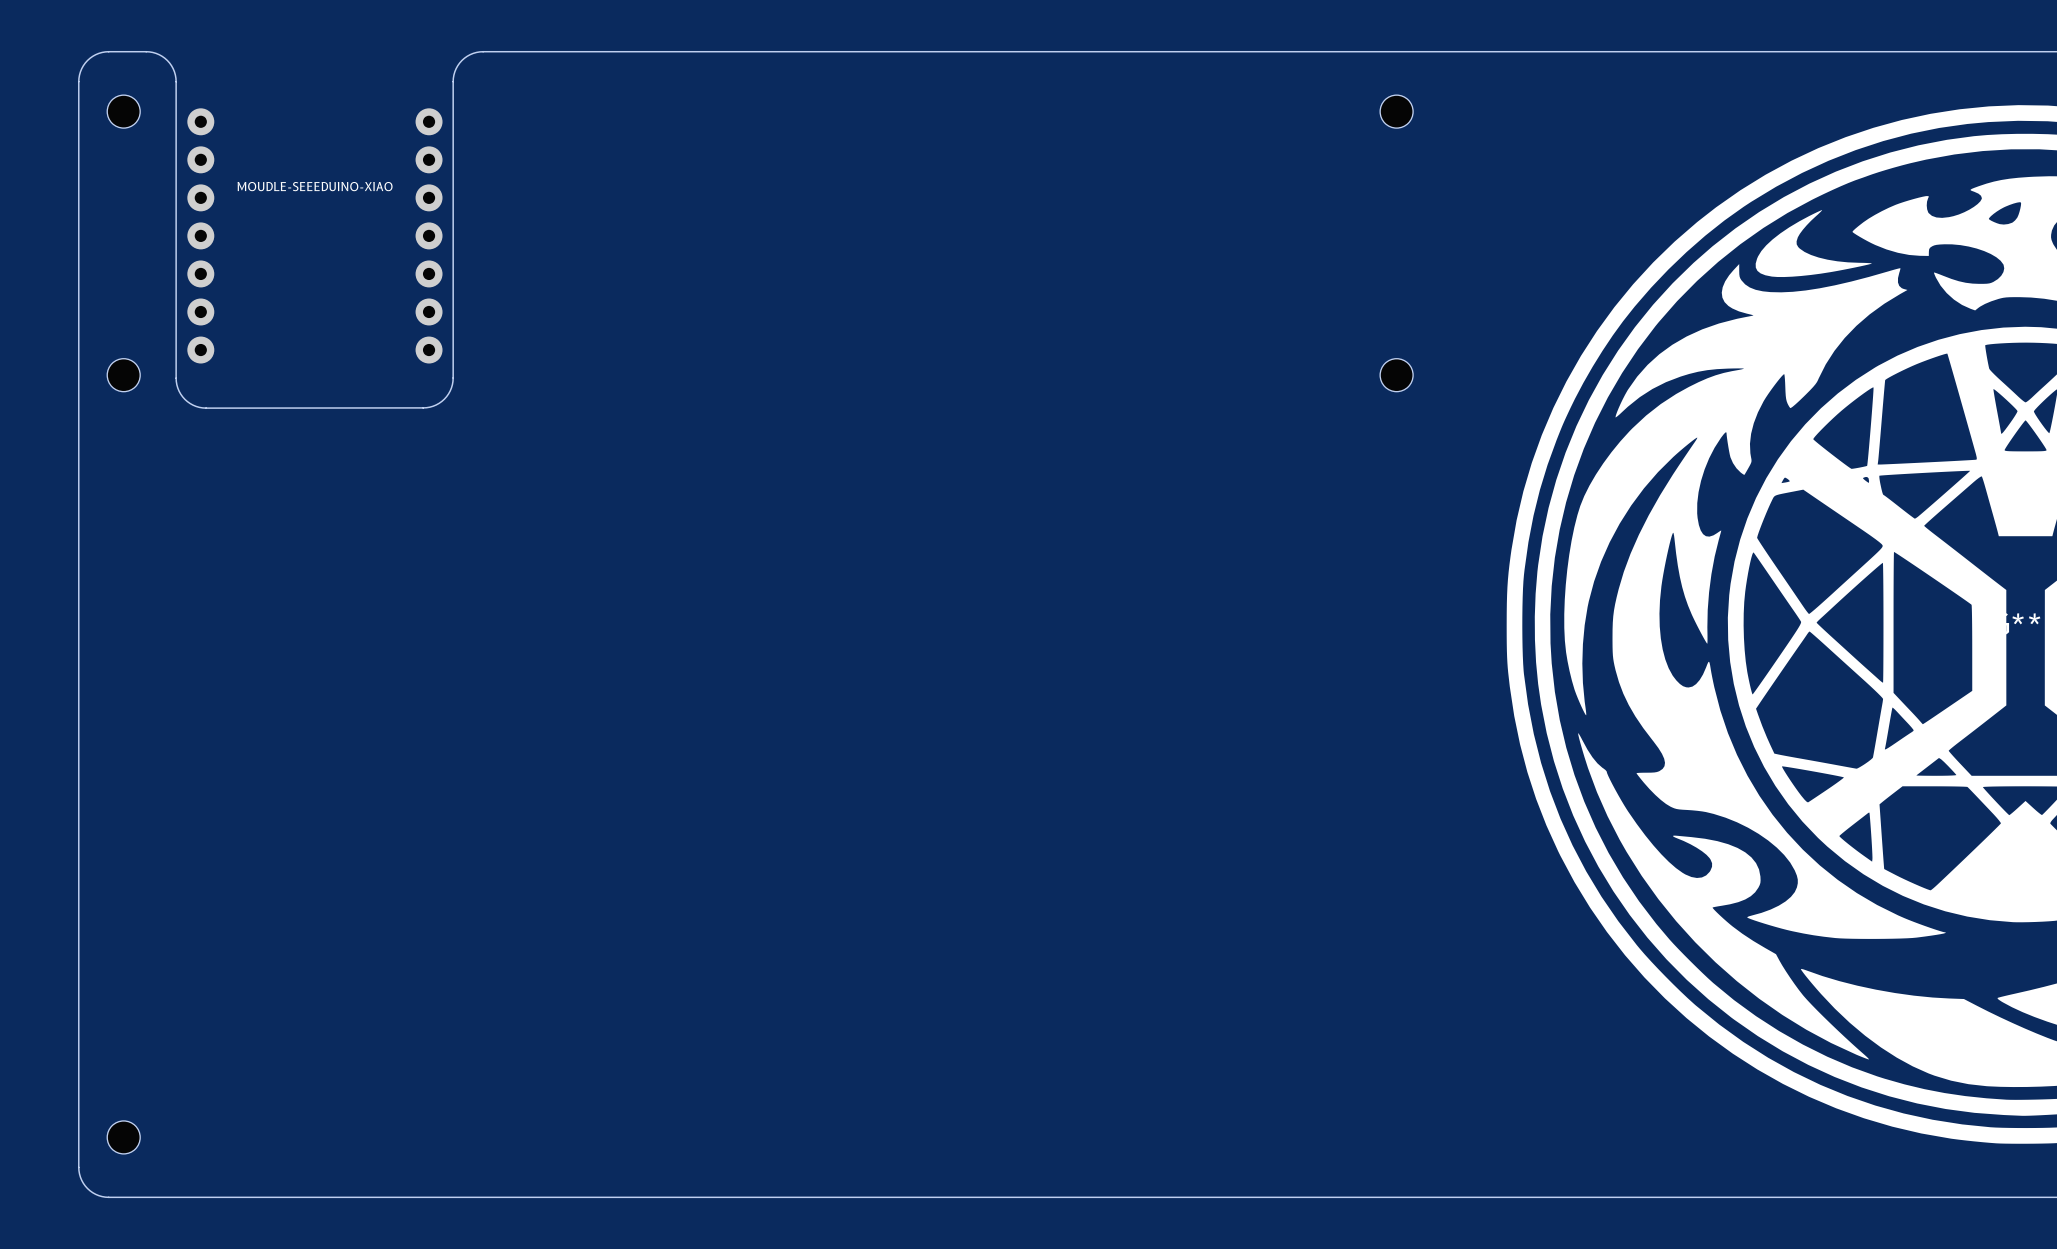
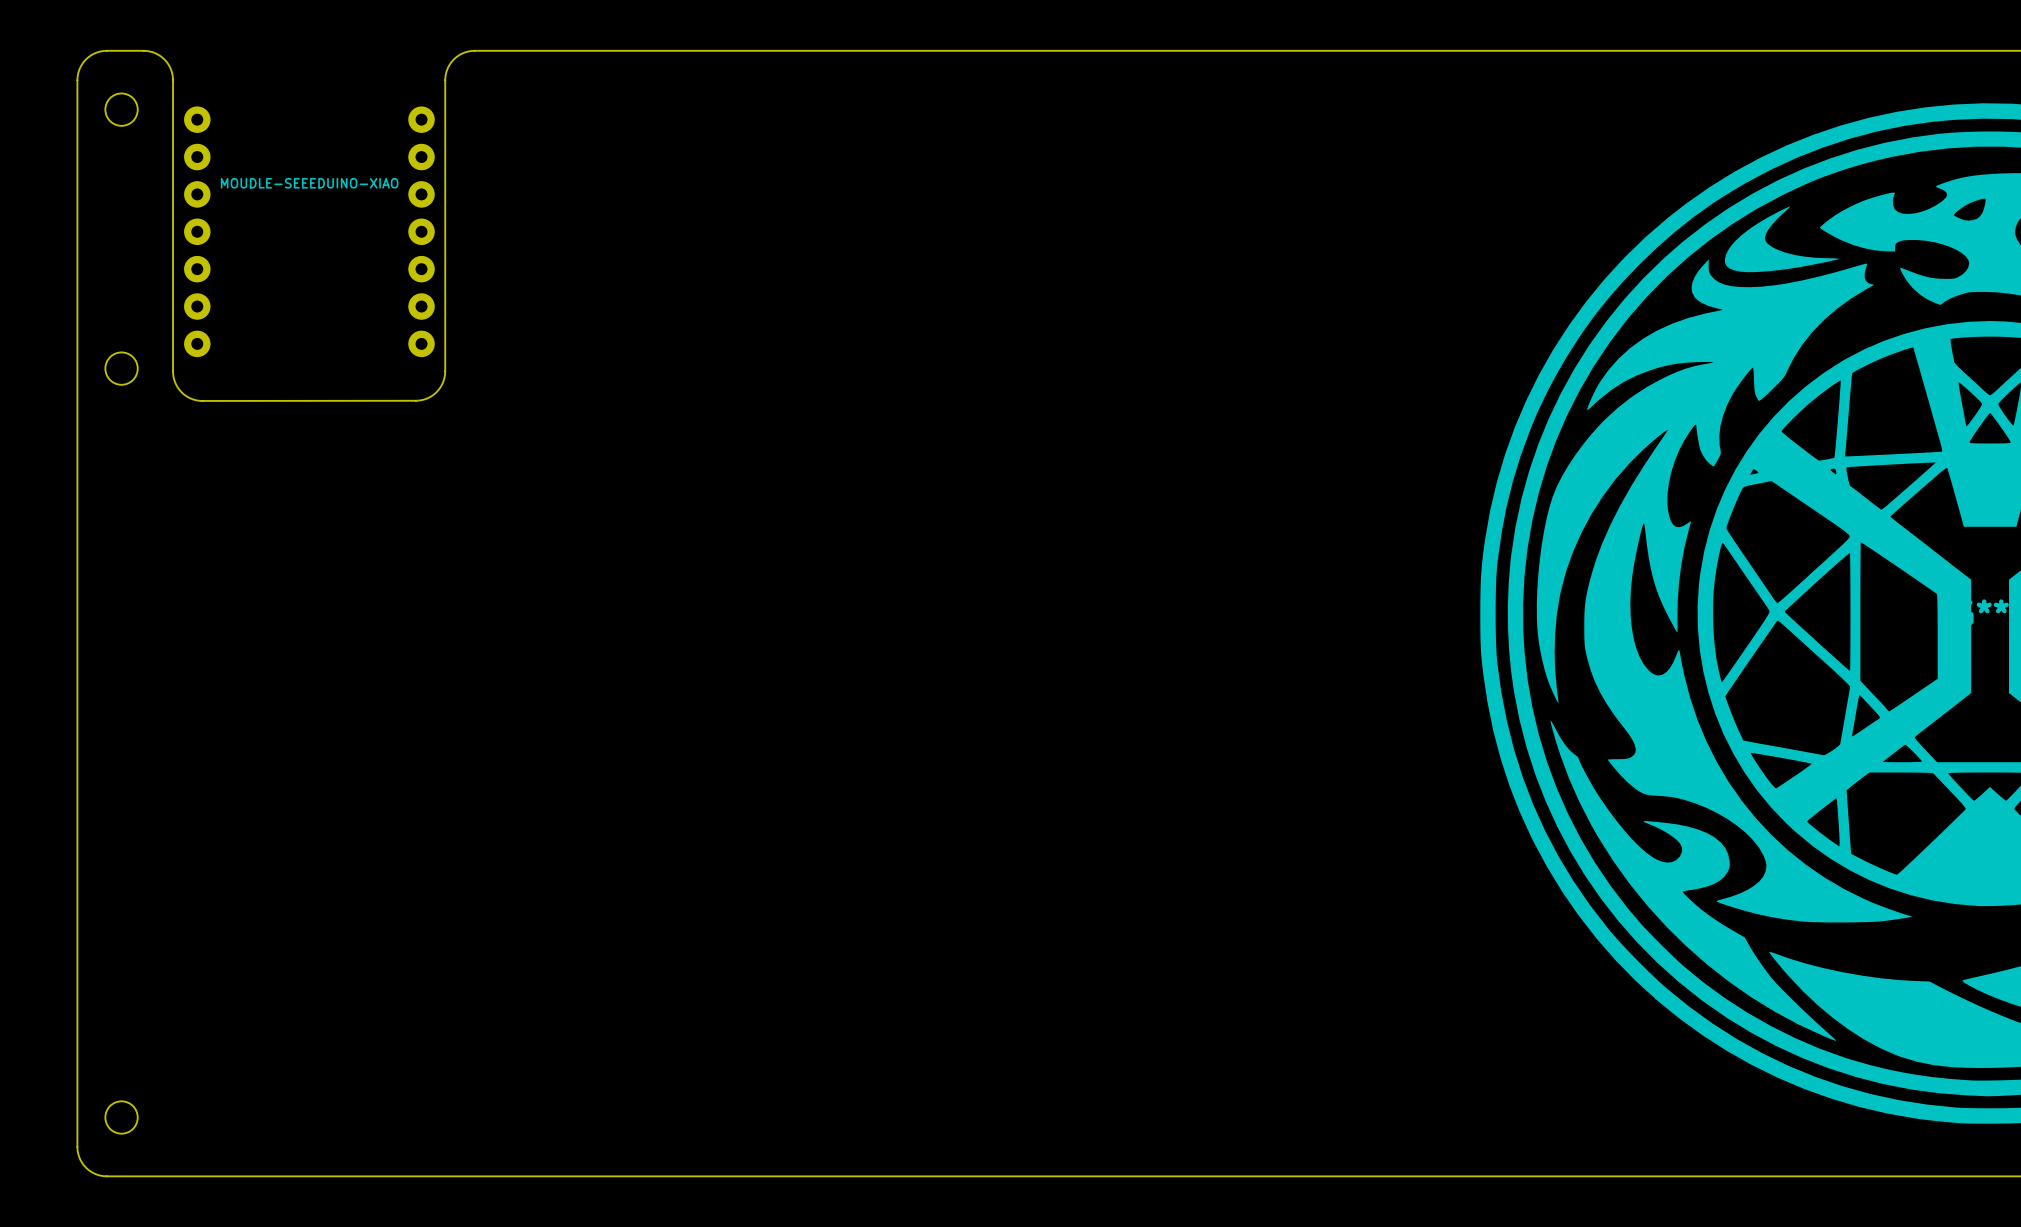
part: (1396, 111) -> none
part: (1396, 375) -> none

